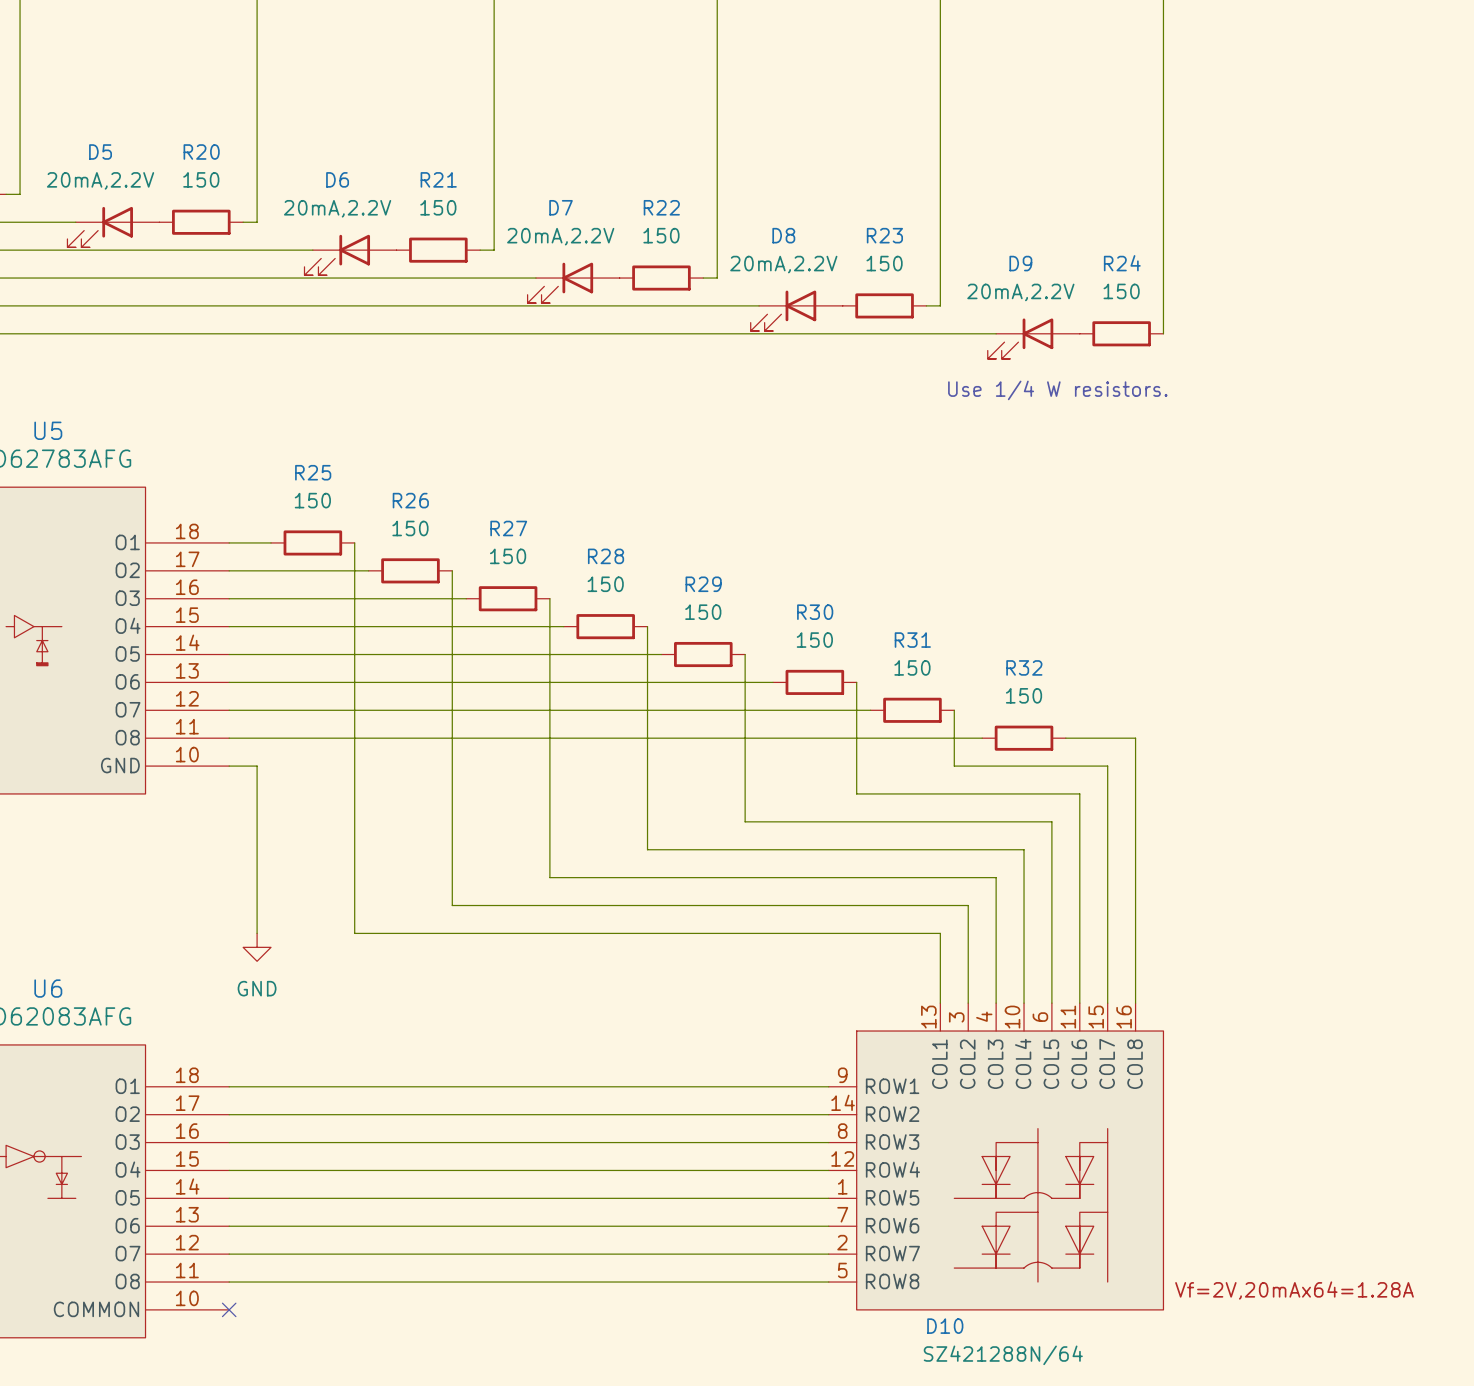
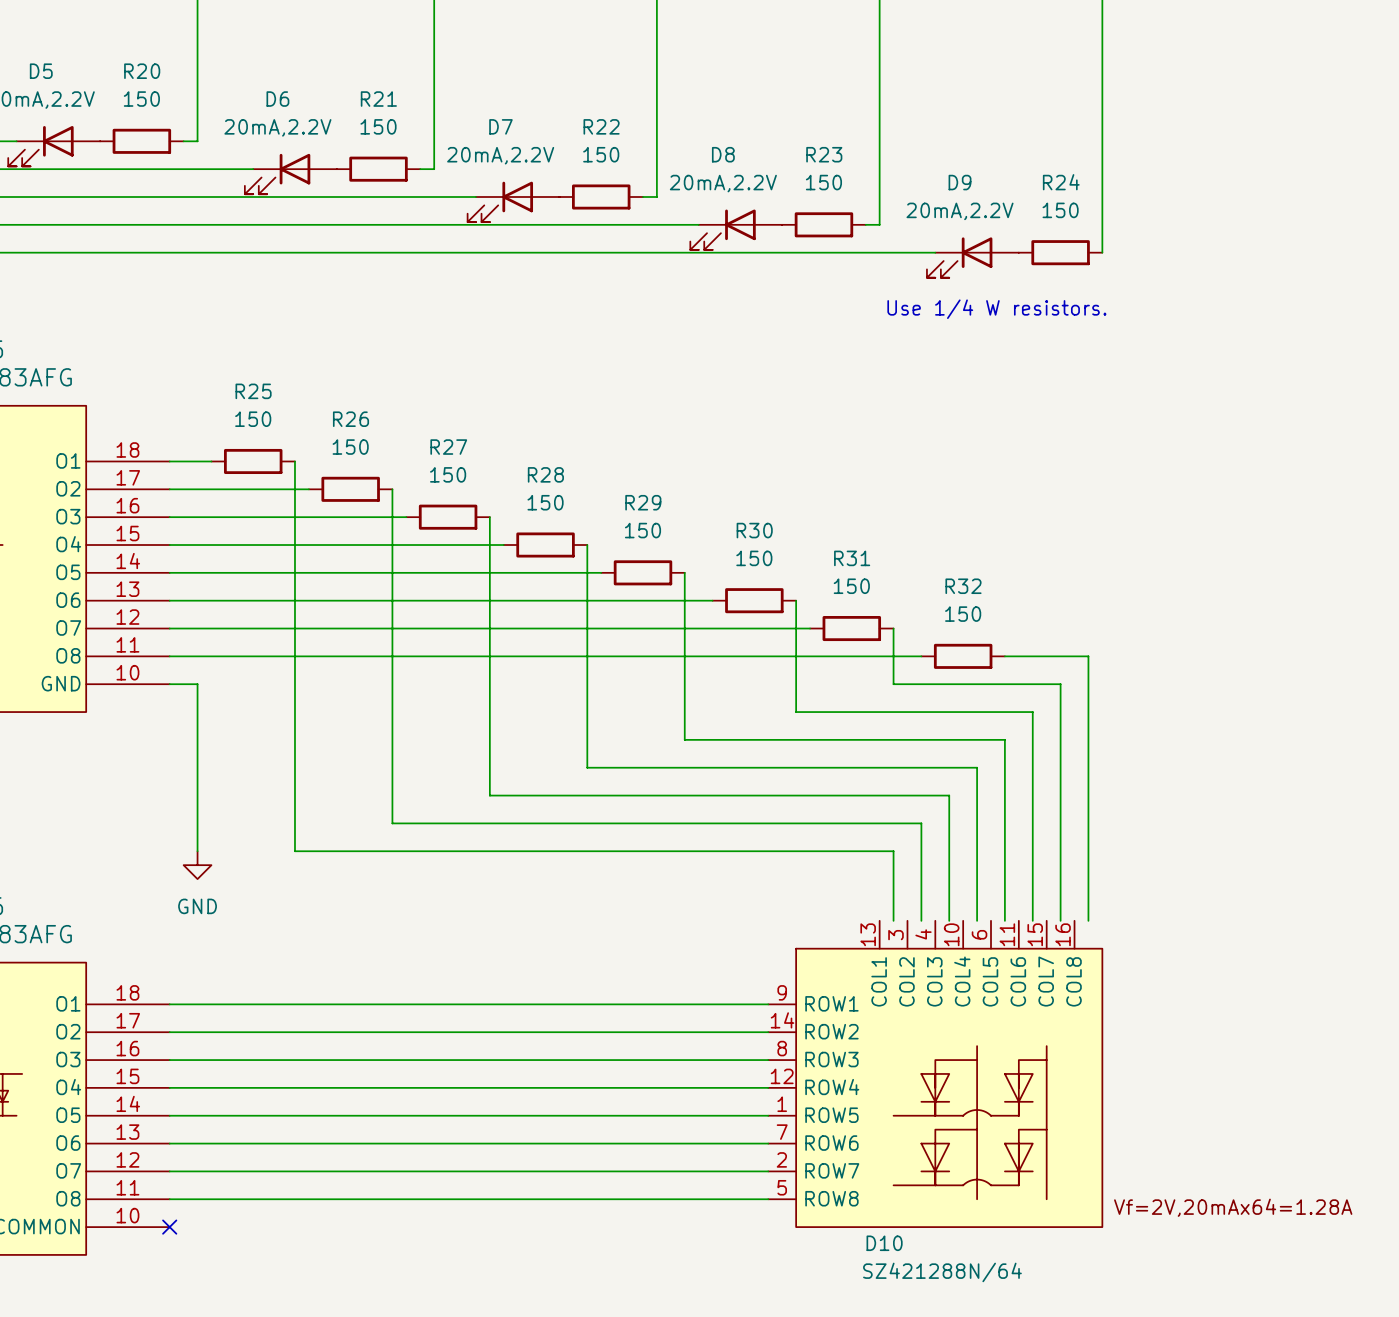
wire: (1135, 738) (1135, 1003) -> (1074, 656) (1088, 656) (1088, 920)
wire: (1107, 766) (1107, 1003) -> (1046, 684) (1060, 684) (1060, 920)
wire: (1079, 793) (1079, 1003) -> (1018, 712) (1032, 712) (1032, 920)
wire: (1051, 821) (1051, 1003) -> (991, 739) (1004, 739) (1004, 920)
wire: (1024, 849) (1024, 1003) -> (963, 767) (977, 767) (977, 920)
wire: (996, 877) (996, 1003) -> (935, 795) (949, 795) (949, 920)
wire: (968, 905) (968, 1003) -> (907, 823) (921, 823) (921, 920)
wire: (940, 933) (940, 1003) -> (879, 851) (893, 851) (893, 920)

